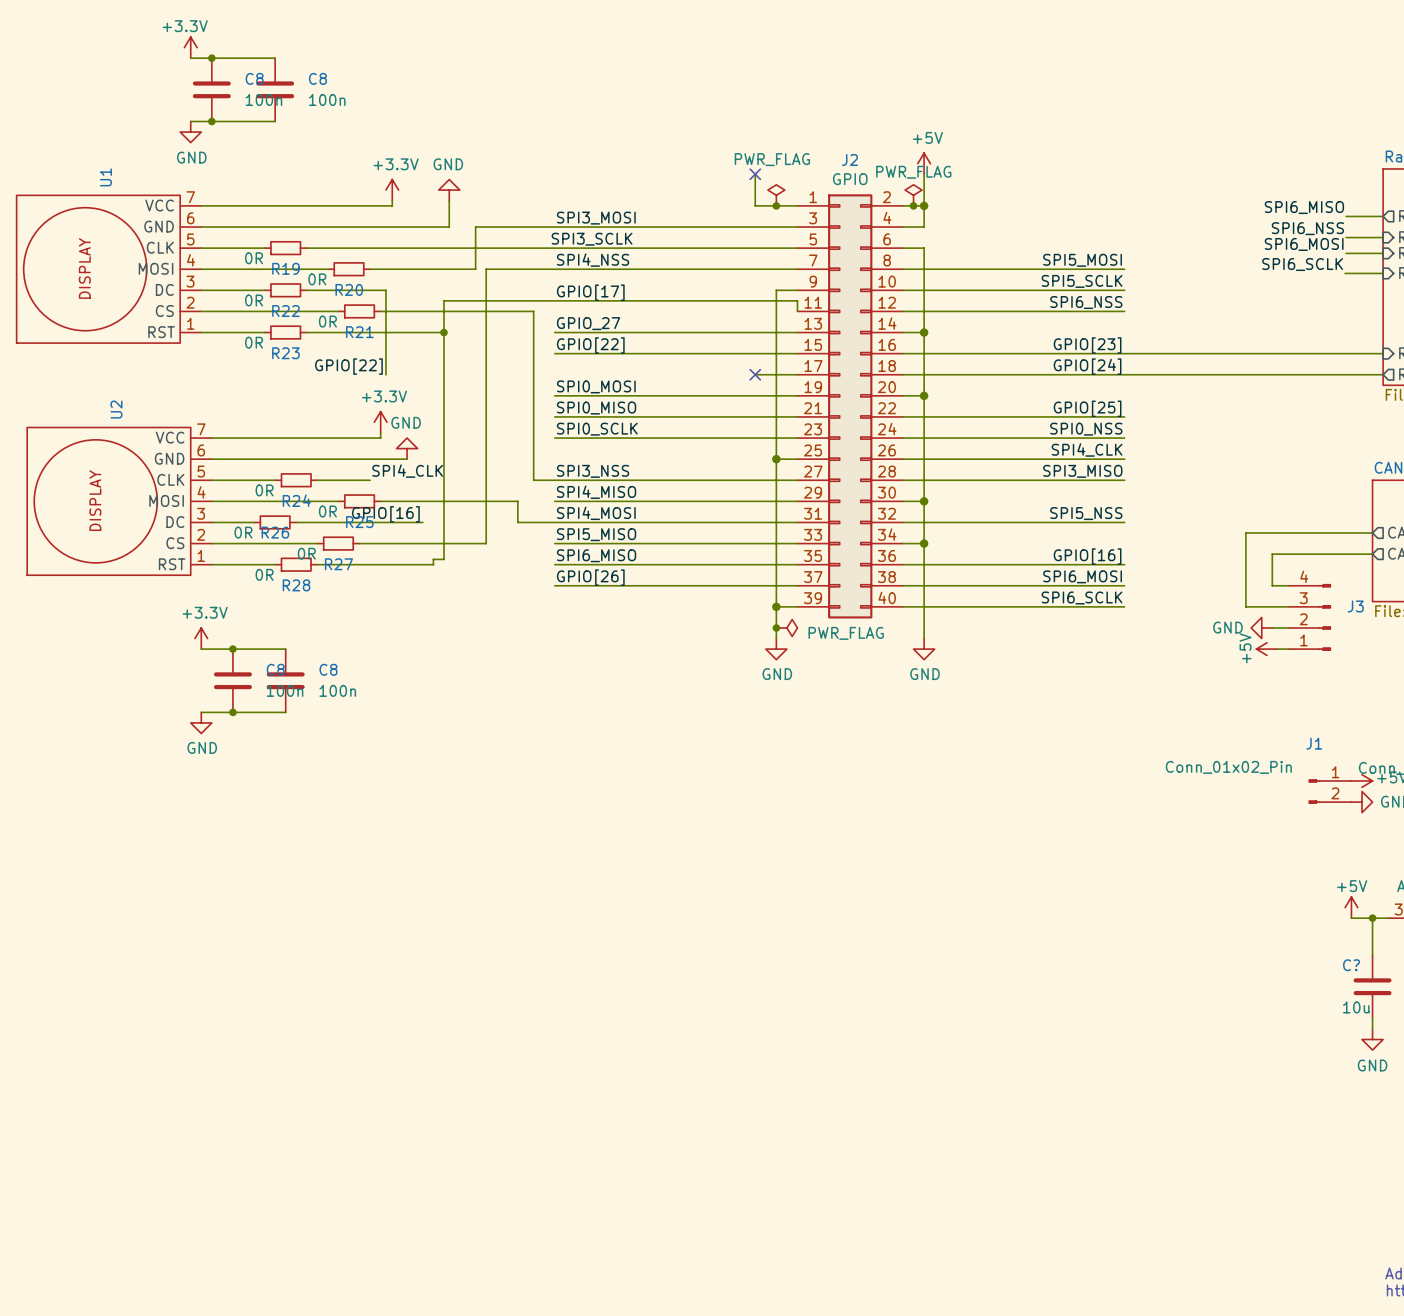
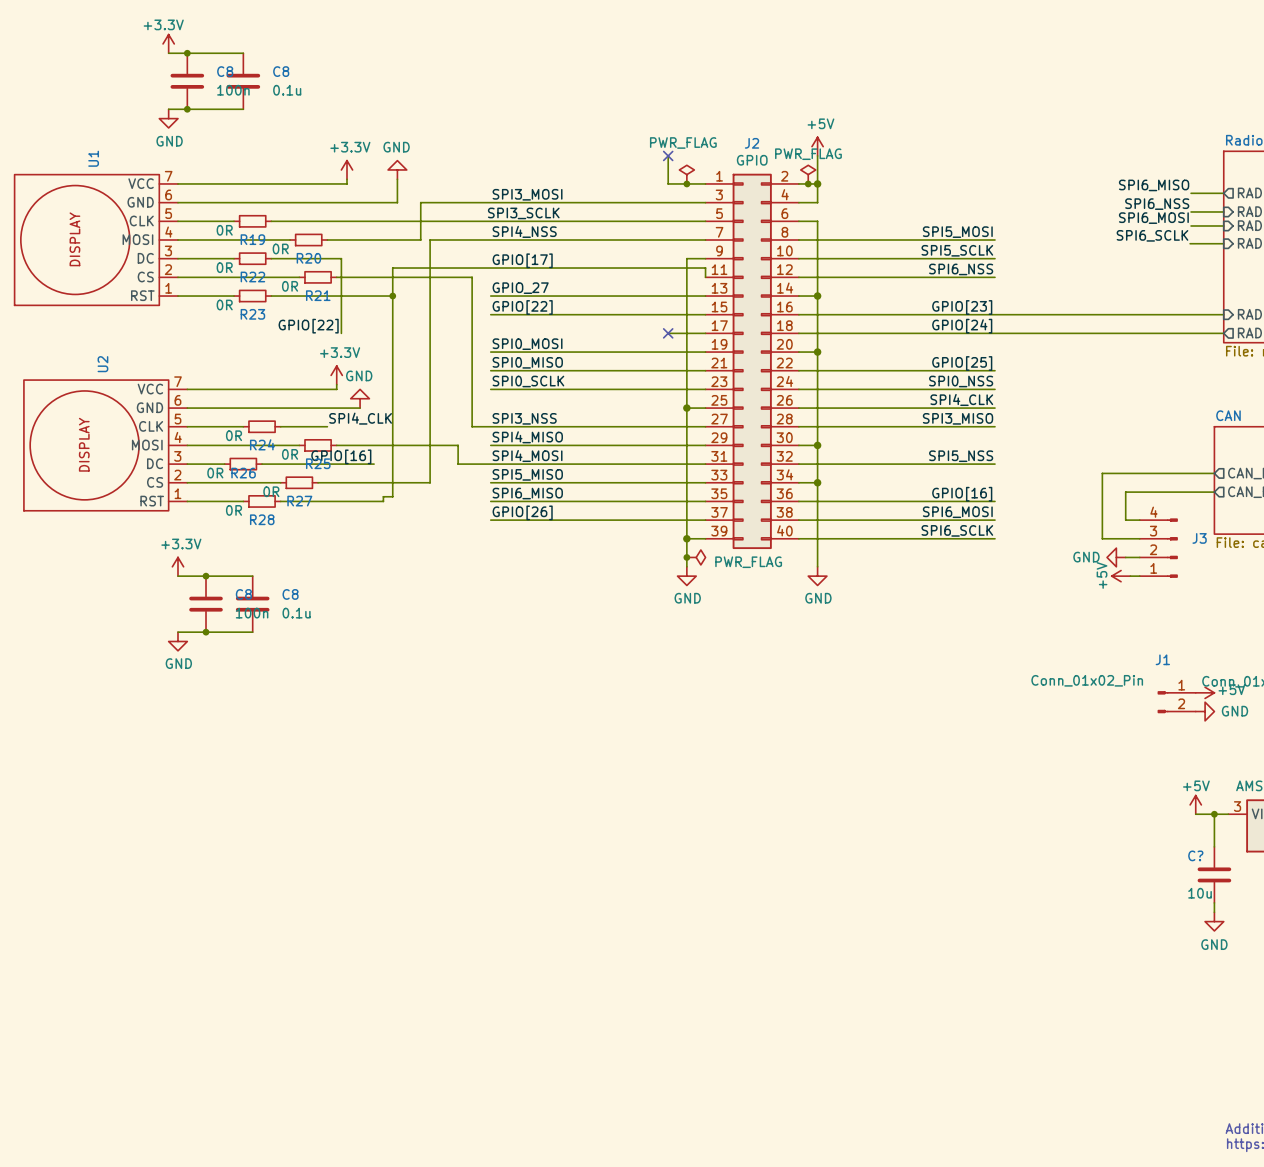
C8 value: 100n (327, 100) -> 0.1u (287, 90)
C8 value: 100n (337, 690) -> 0.1u (296, 613)

